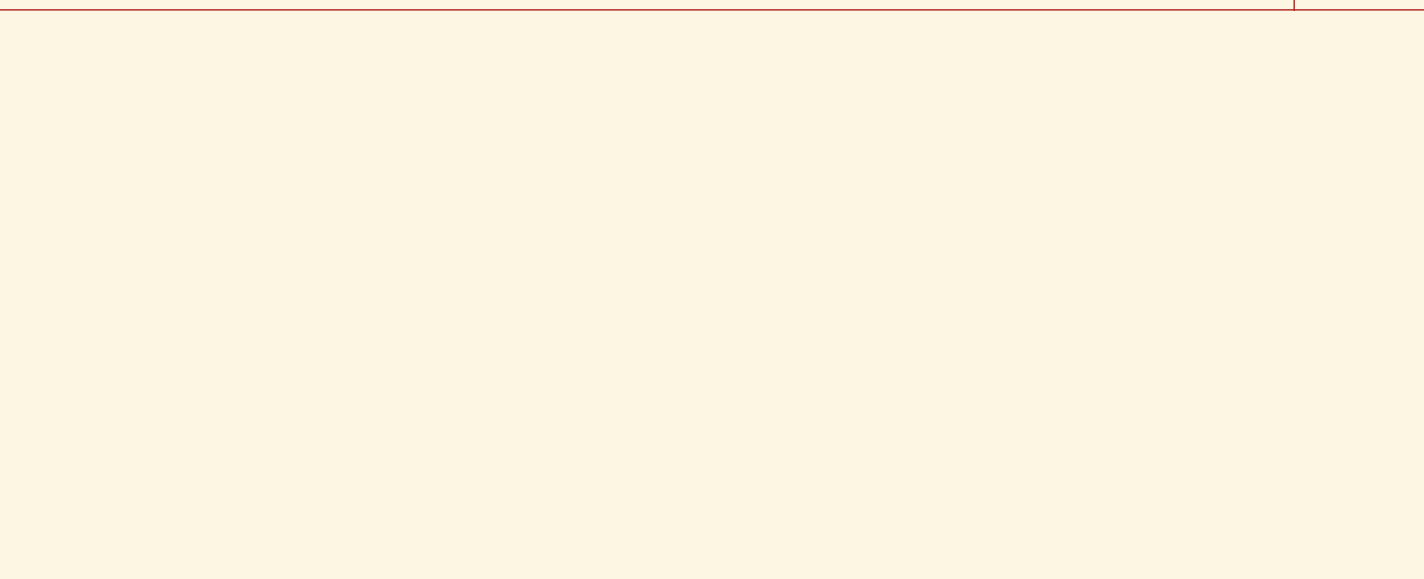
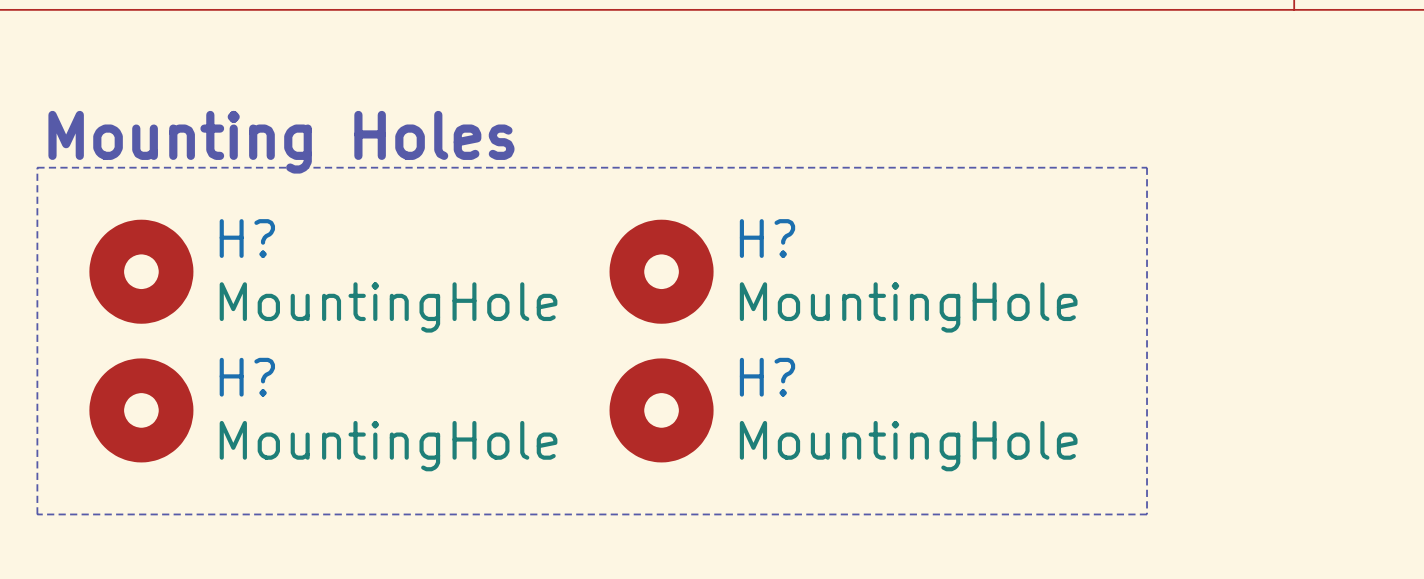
text: none -> Mounting Holes (281, 142)
line: none -> (37, 167) (37, 514) (1147, 514) (1147, 167) (37, 167)
H?: none -> MountingHole (141, 271)
H?: none -> MountingHole (661, 271)
H?: none -> MountingHole (141, 410)
H?: none -> MountingHole (661, 410)

